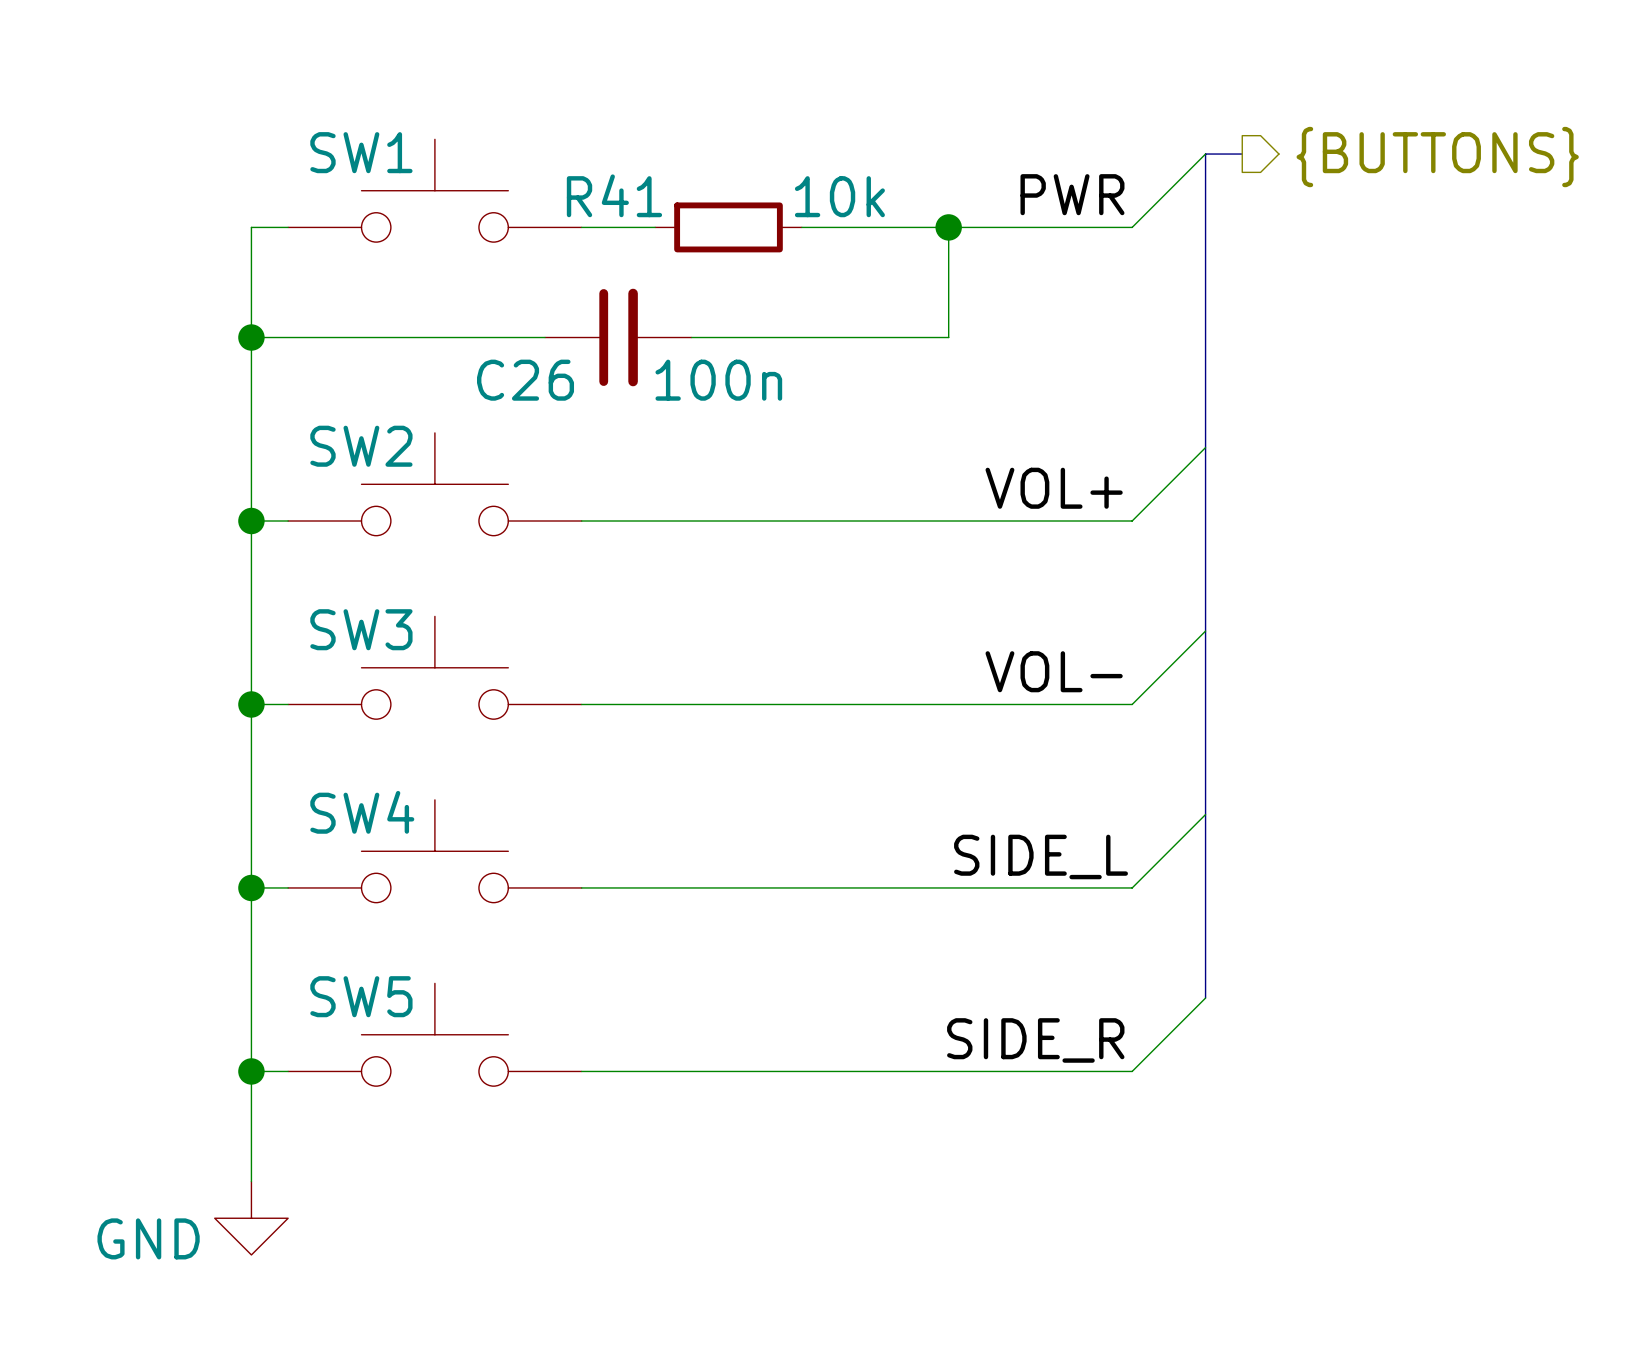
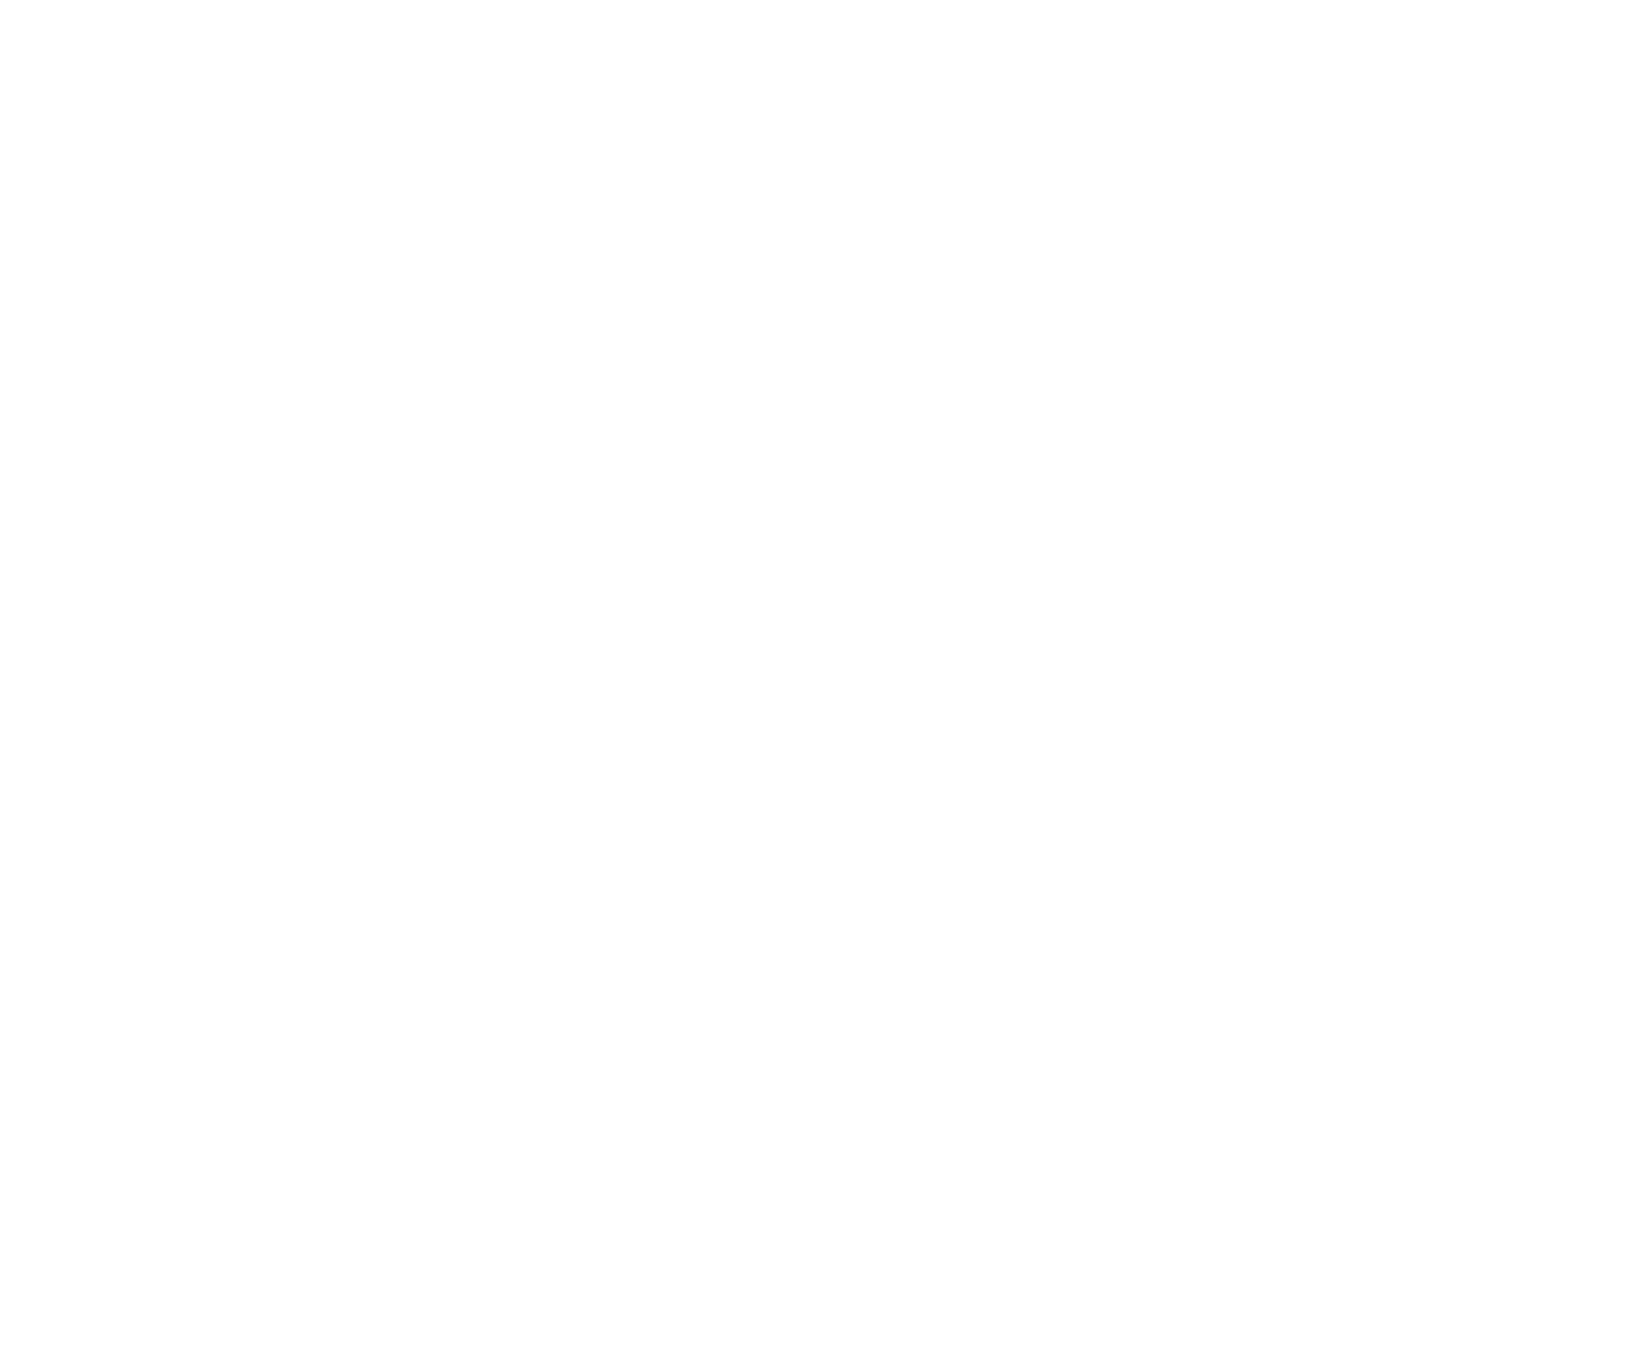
wire: (1205, 154) (1132, 227) (801, 227) -> none
bus: (1242, 154) (1205, 154) (1205, 998) -> none
hierarchical label: {BUTTONS} (1437, 157) -> none
SW1: (434, 190) -> none
label: PWR (1072, 194) -> none
wire: (288, 227) (251, 227) (251, 1181) -> none
wire: (581, 227) (655, 227) -> none
R41: 10k (728, 227) -> none
wire: (948, 227) (948, 337) (691, 337) -> none
junction: (948, 227) -> none
wire: (251, 337) (545, 337) -> none
junction: (251, 337) -> none
C26: 100n (618, 337) -> none
wire: (1205, 447) (1132, 521) (581, 521) -> none
SW2: (434, 484) -> none
label: VOL+ (1054, 488) -> none
wire: (251, 521) (288, 521) -> none
junction: (251, 521) -> none
wire: (1205, 631) (1132, 704) (581, 704) -> none
SW3: (434, 667) -> none
label: VOL- (1054, 671) -> none
wire: (251, 704) (288, 704) -> none
junction: (251, 704) -> none
wire: (1205, 814) (1132, 887) (581, 887) -> none
SW4: (434, 851) -> none
label: SIDE_L (1041, 856) -> none
wire: (251, 887) (288, 887) -> none
junction: (251, 887) -> none
wire: (1205, 998) (1132, 1071) (581, 1071) -> none
SW5: (434, 1034) -> none
label: SIDE_R (1035, 1040) -> none
wire: (251, 1071) (288, 1071) -> none
junction: (251, 1071) -> none
power symbol: GND (251, 1218) -> none

